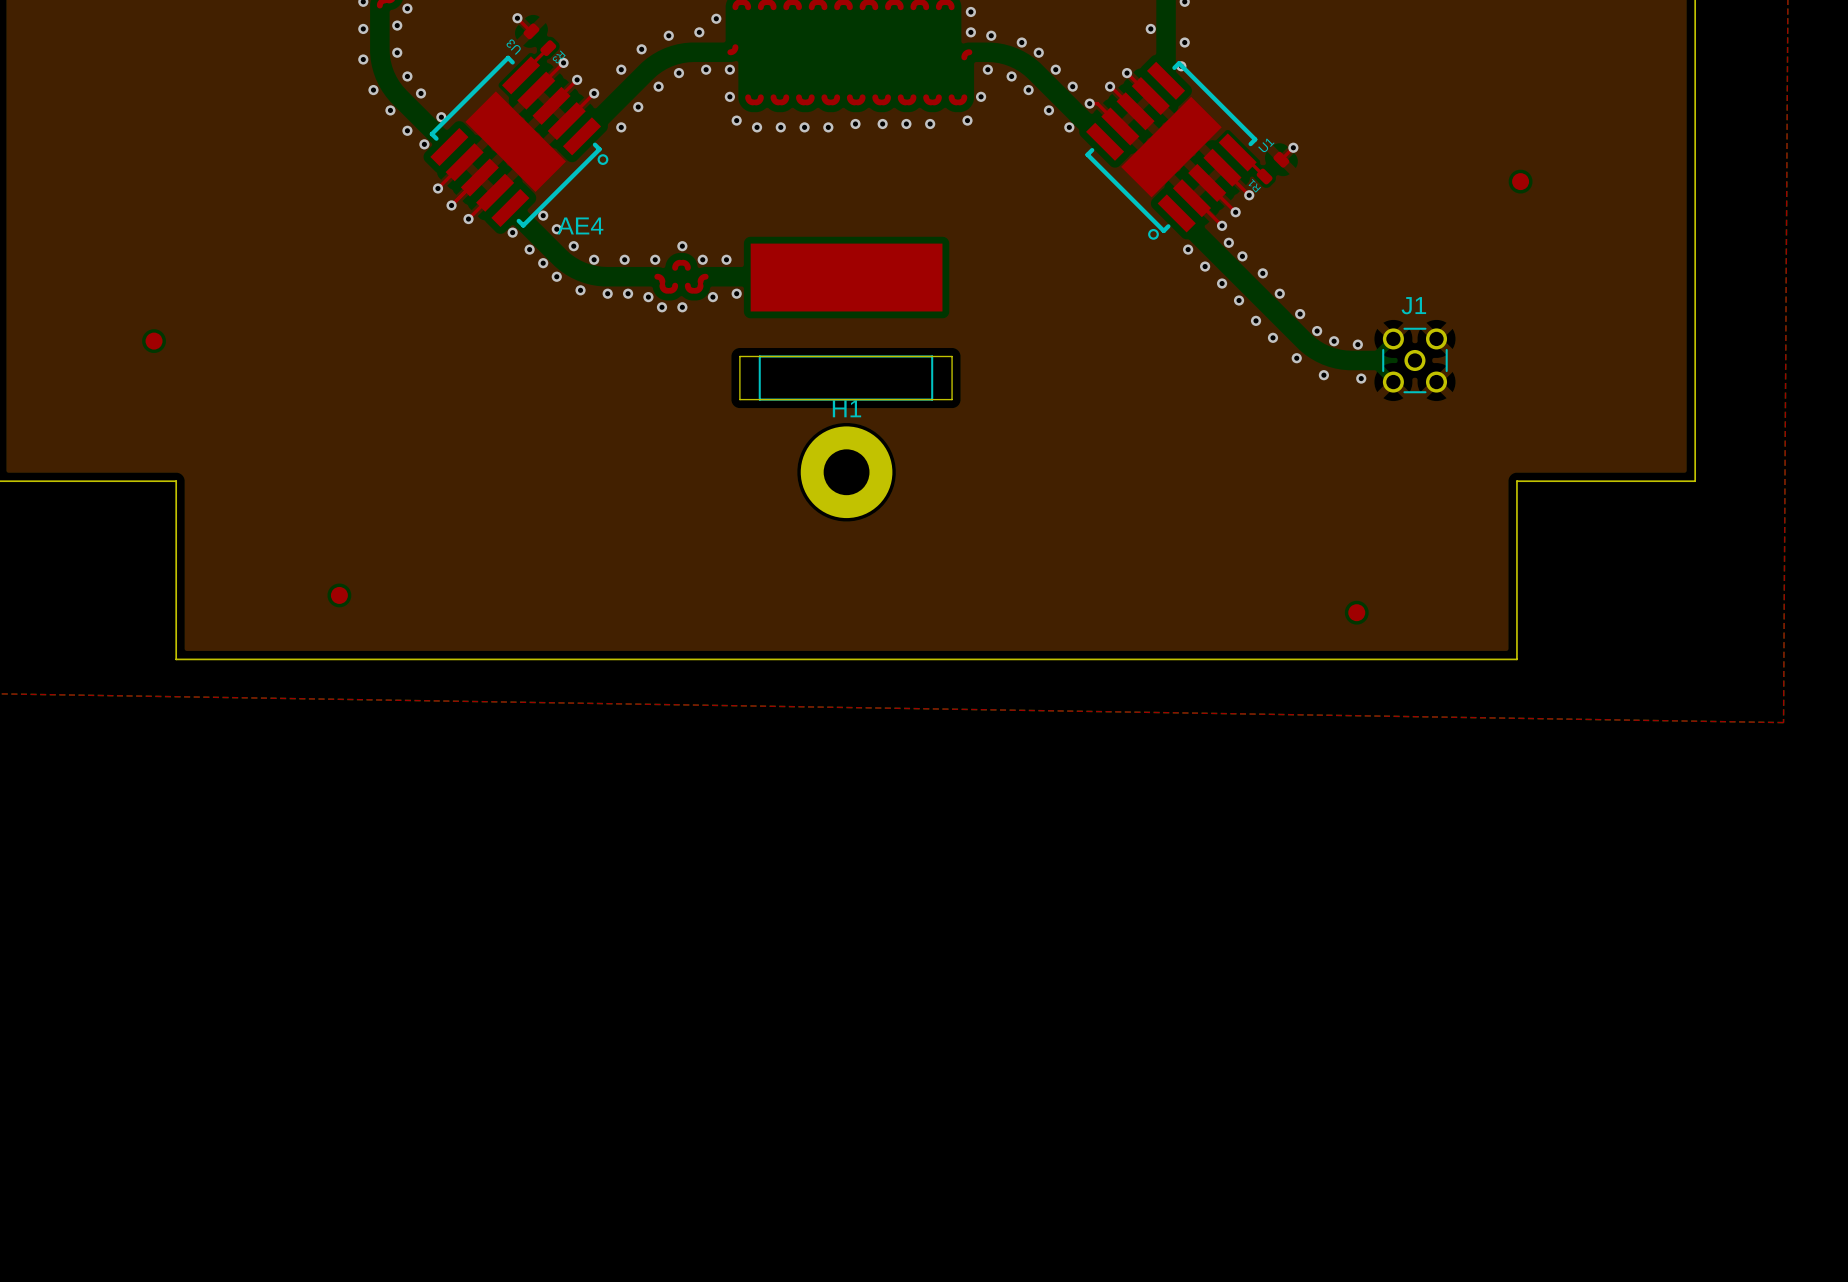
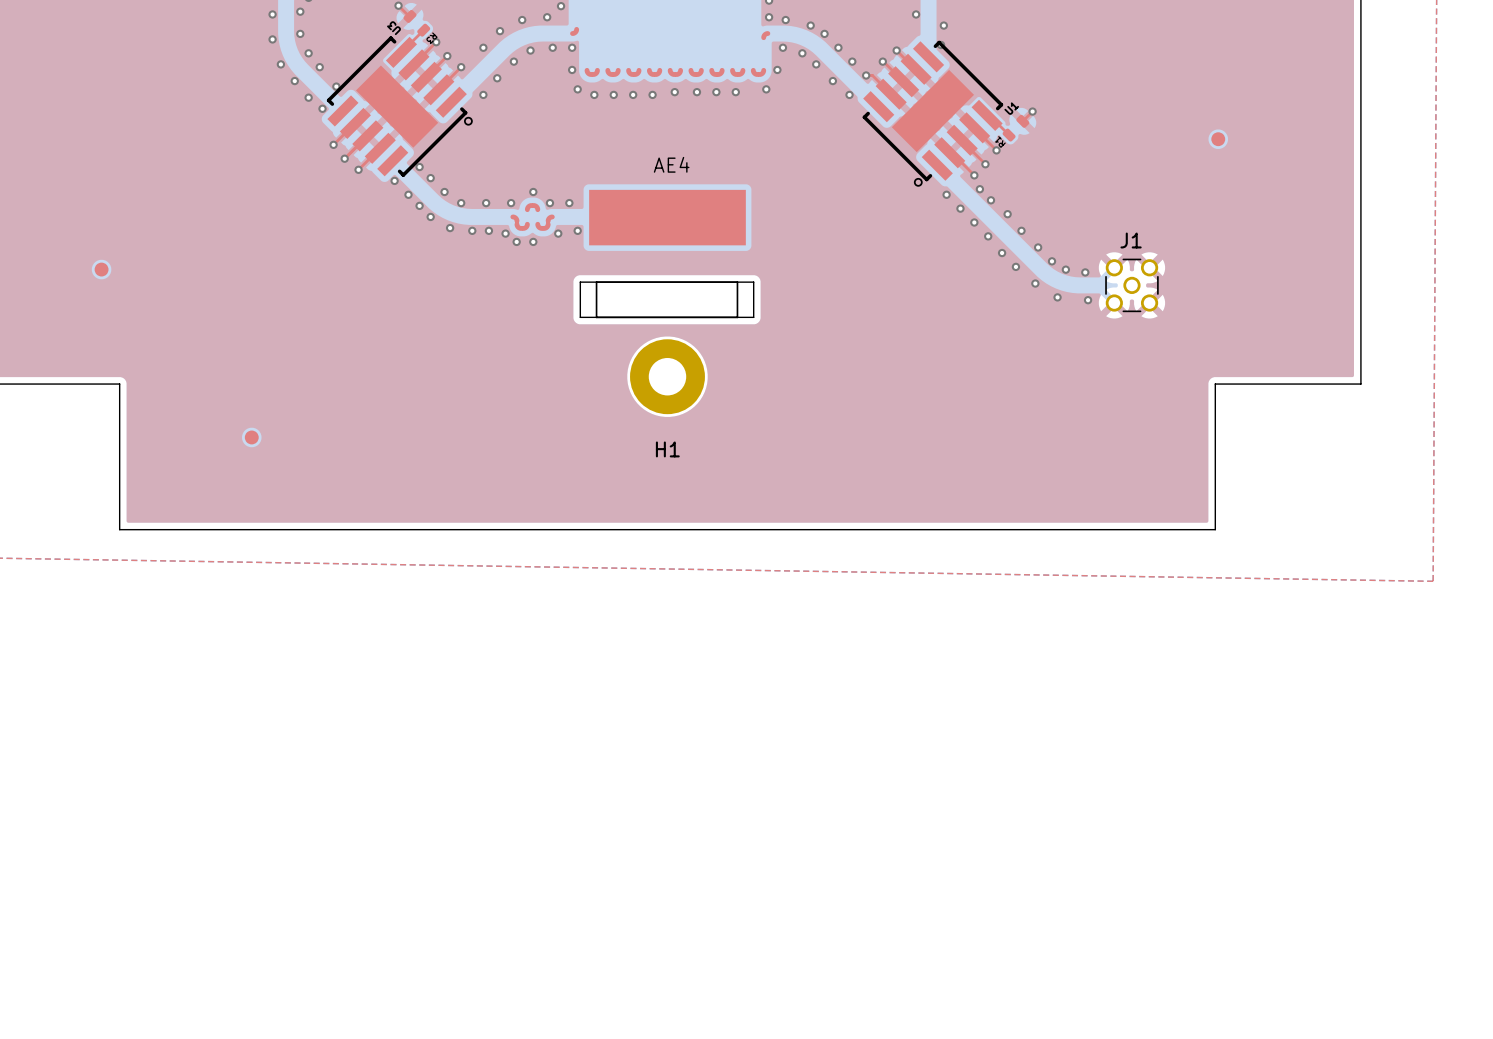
AE4 name position: AE4 (580, 225) -> AE4 (671, 164)
H1 name position: H1 (846, 408) -> H1 (667, 449)
part position: (339, 595) -> (251, 437)
part: (1356, 612) -> none

